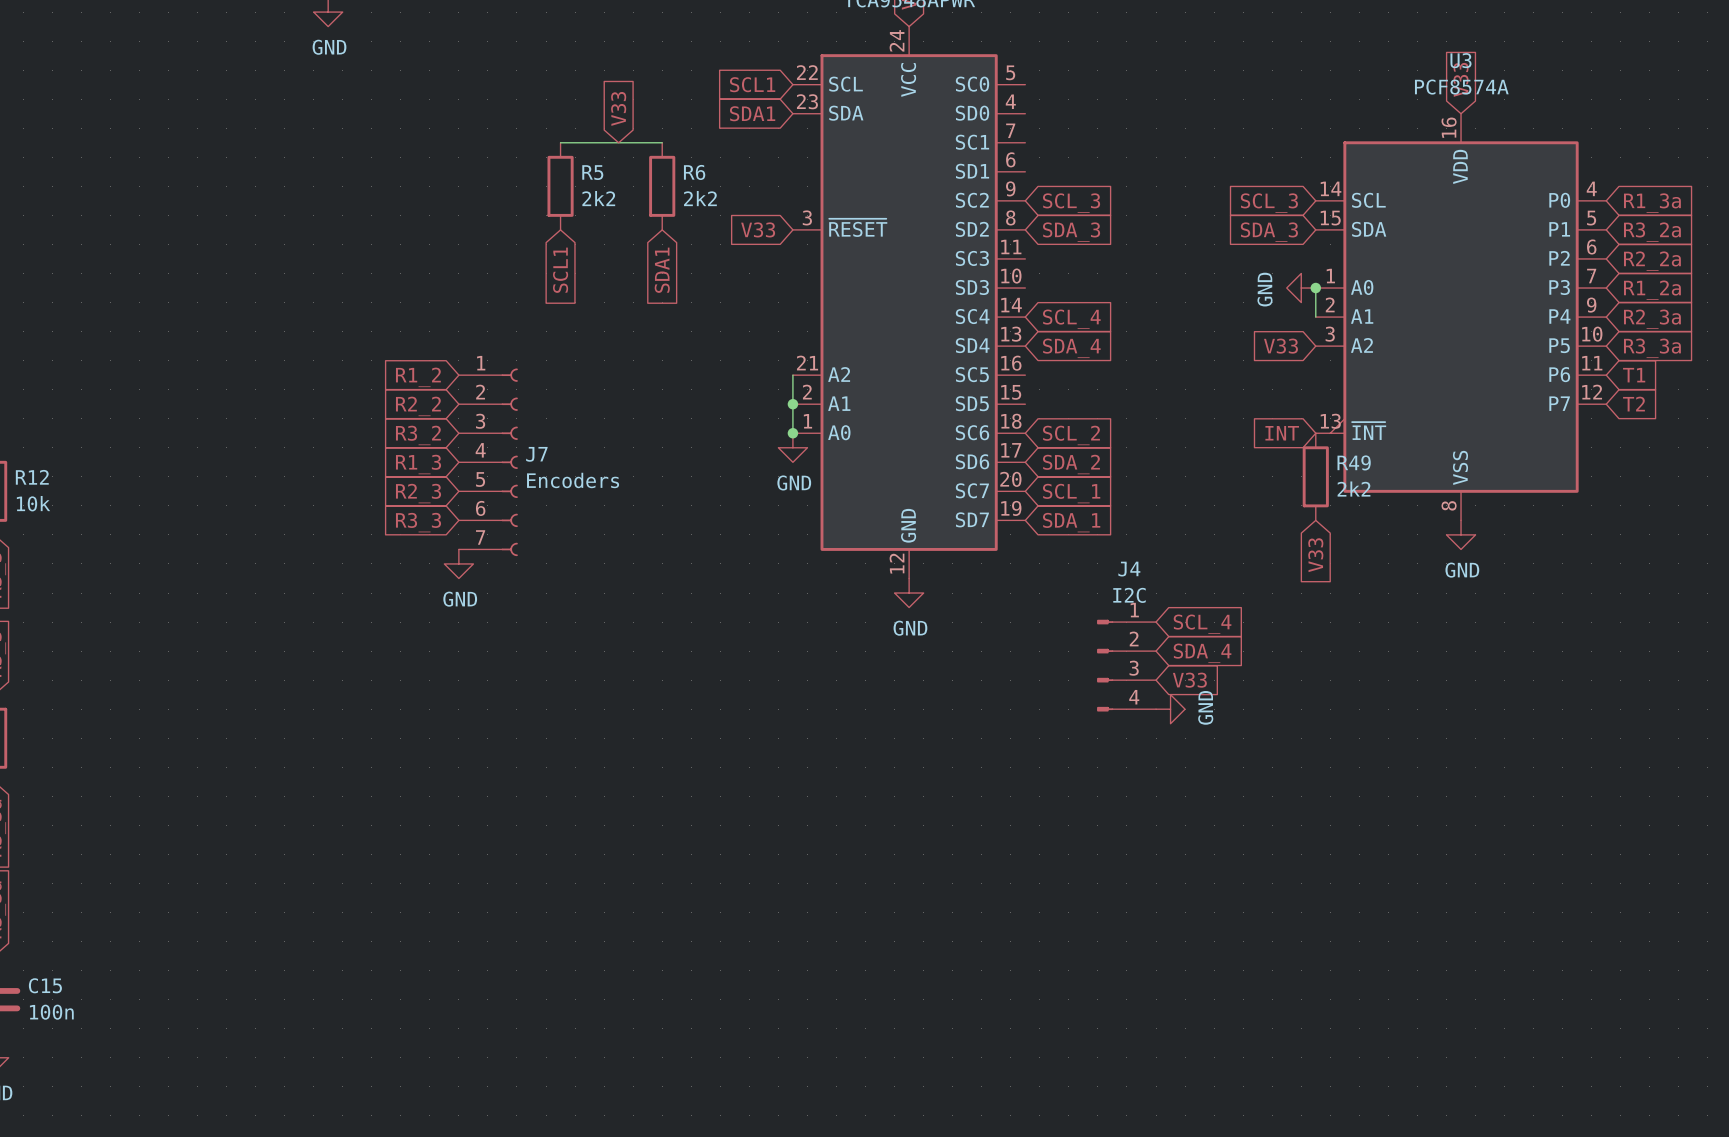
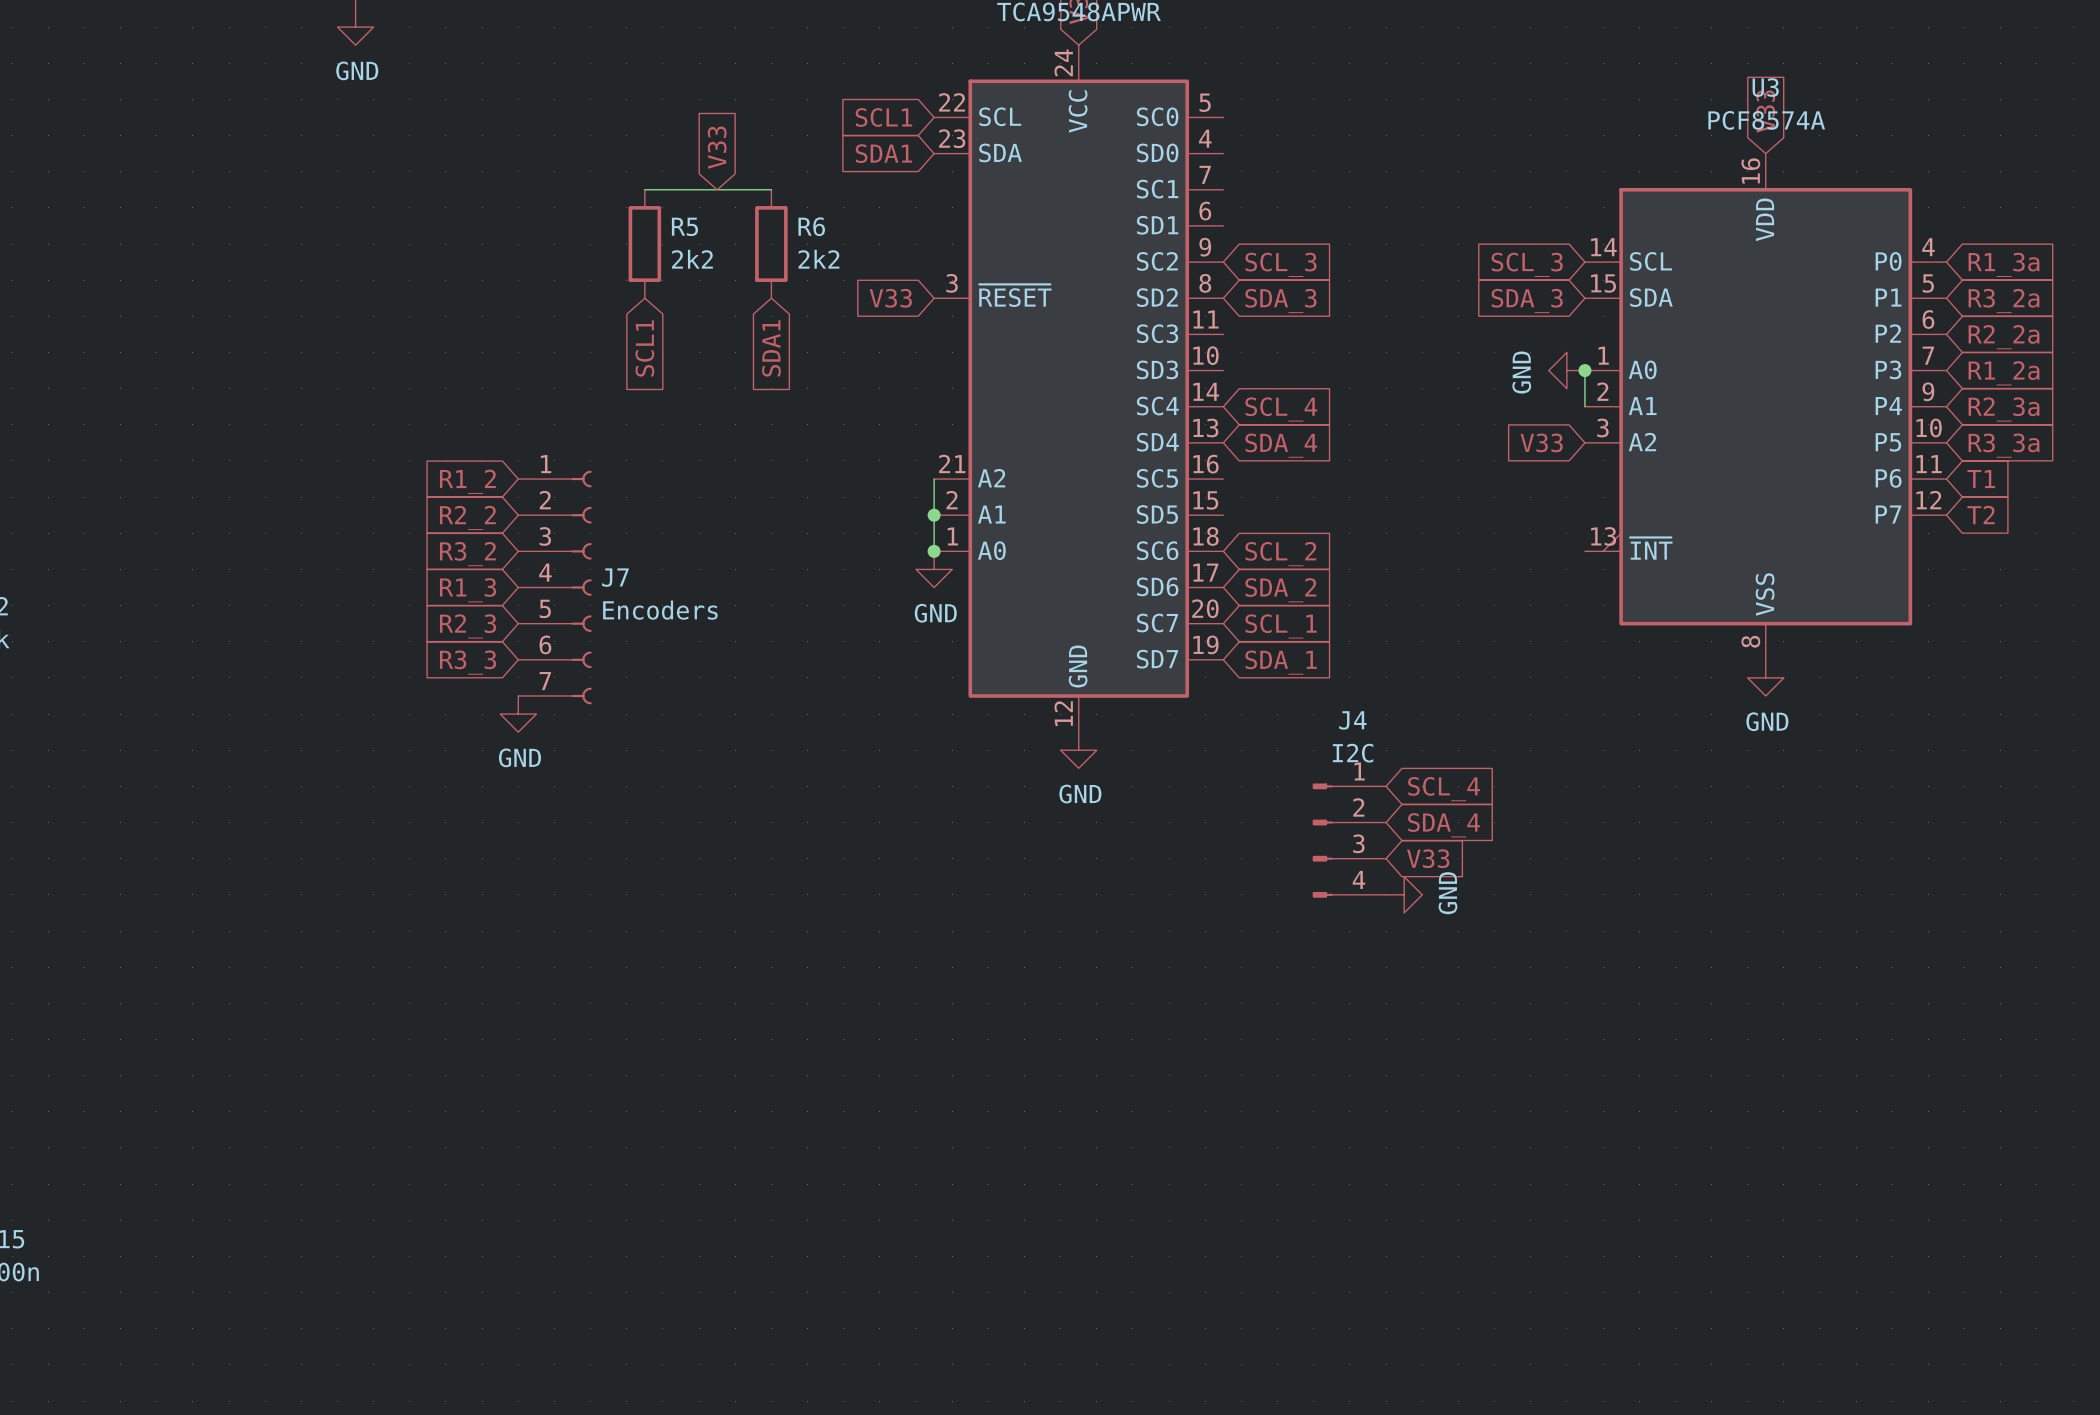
global label: INT (1282, 433) -> none
R49: 2k2 (1315, 476) -> none
global label: V33 (1315, 555) -> none

